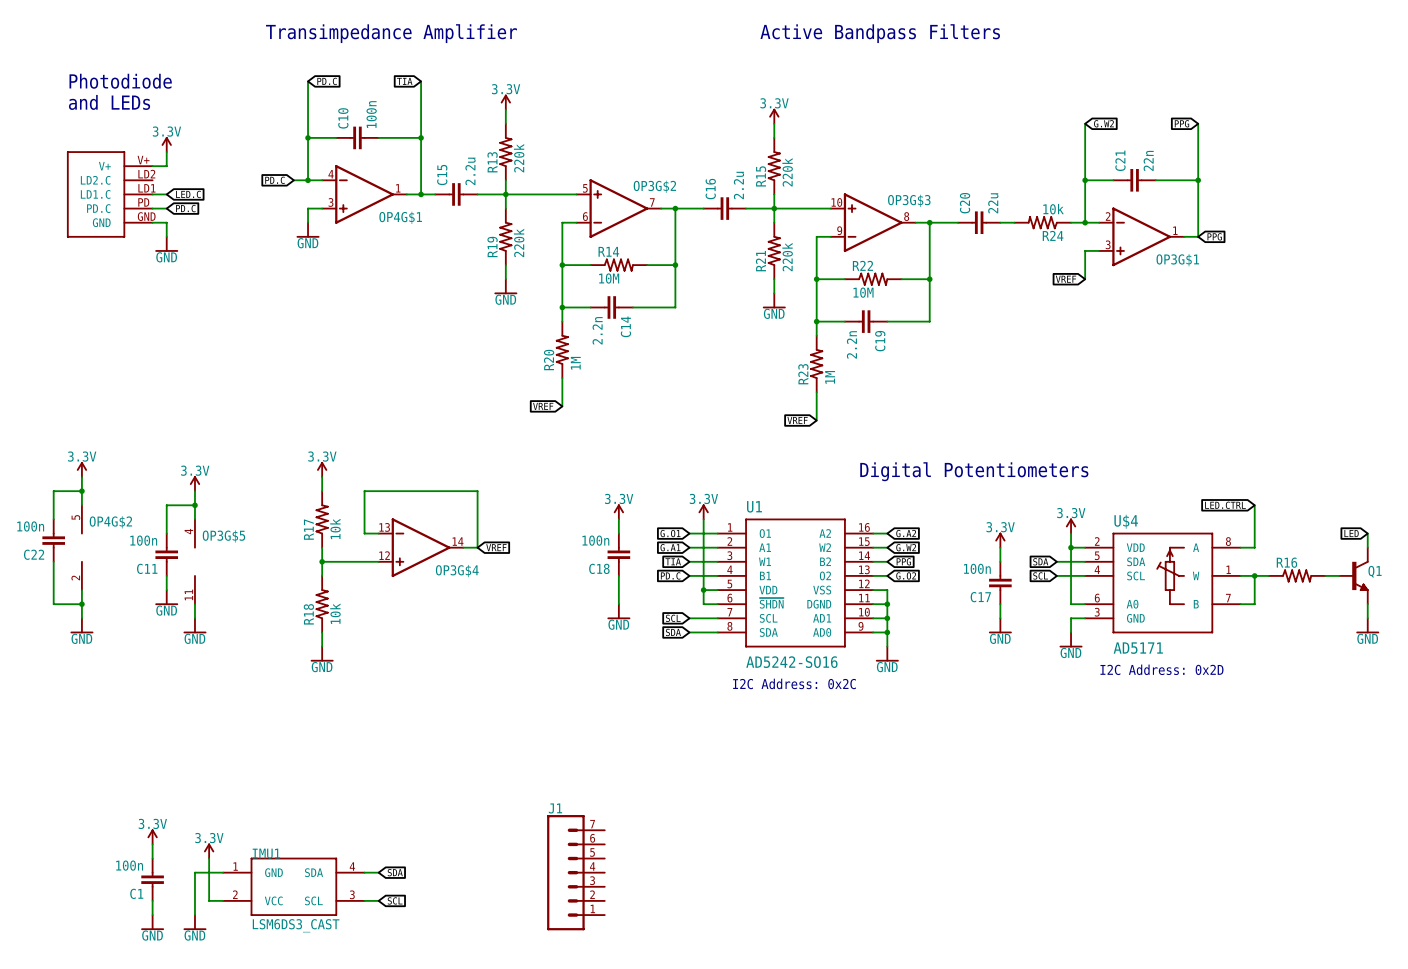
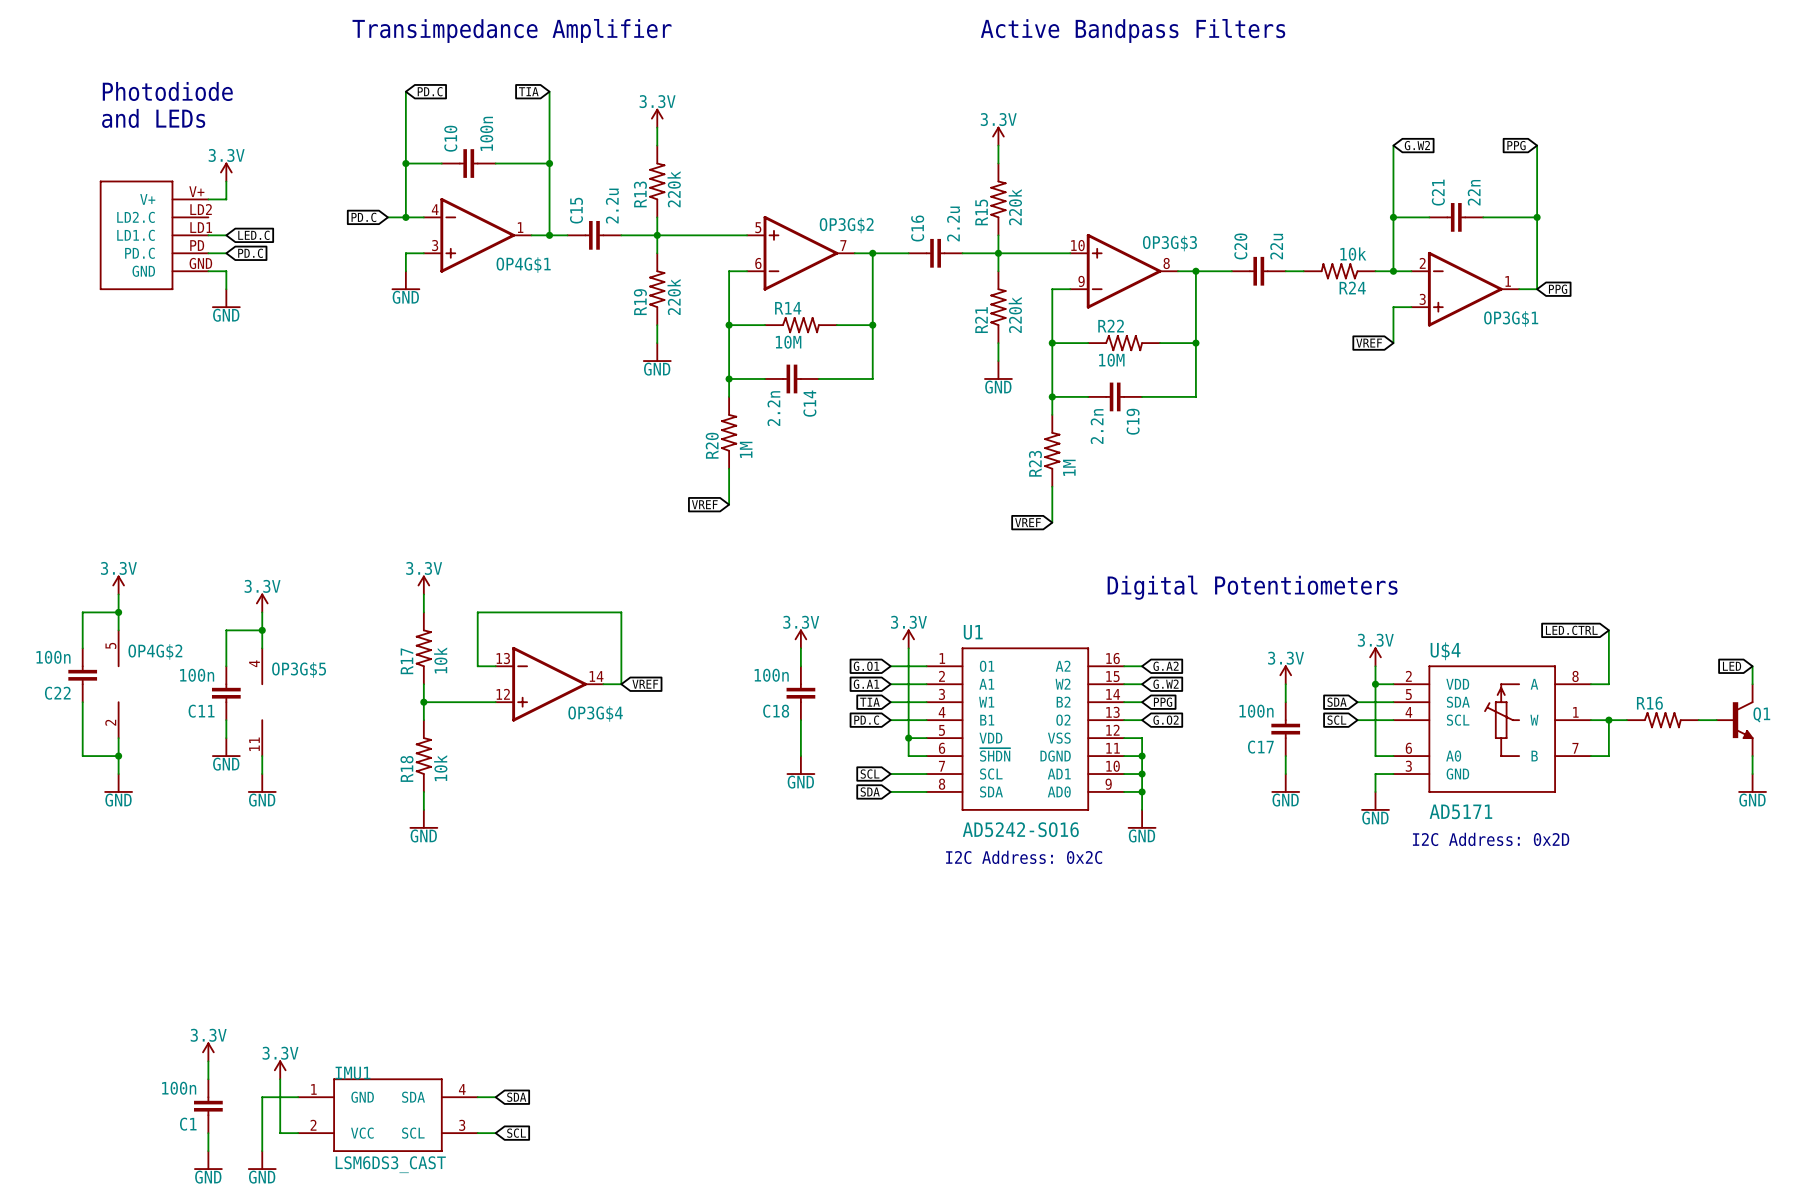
J1: (575, 872) -> none

